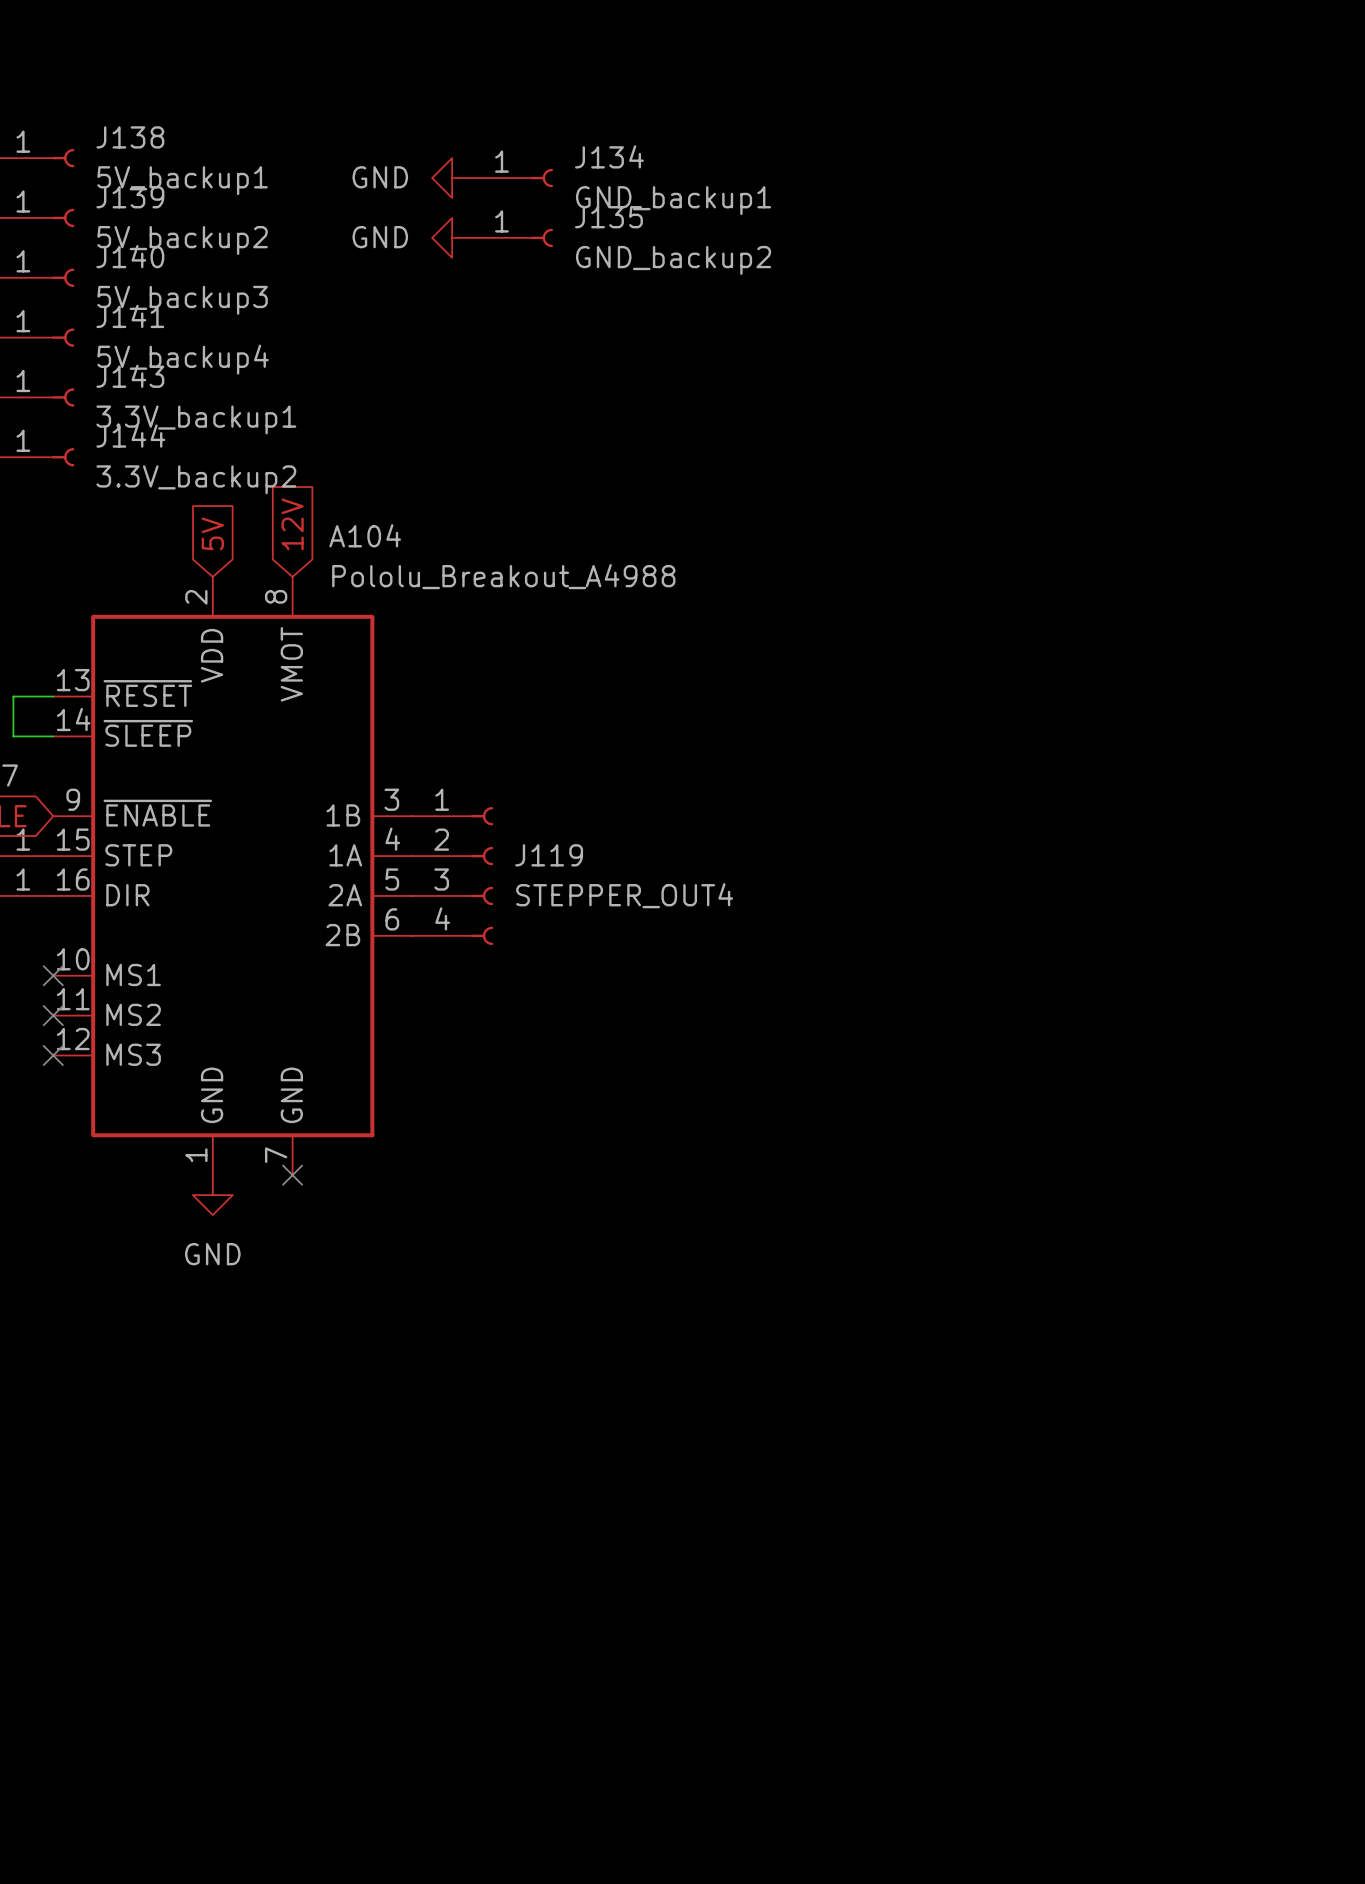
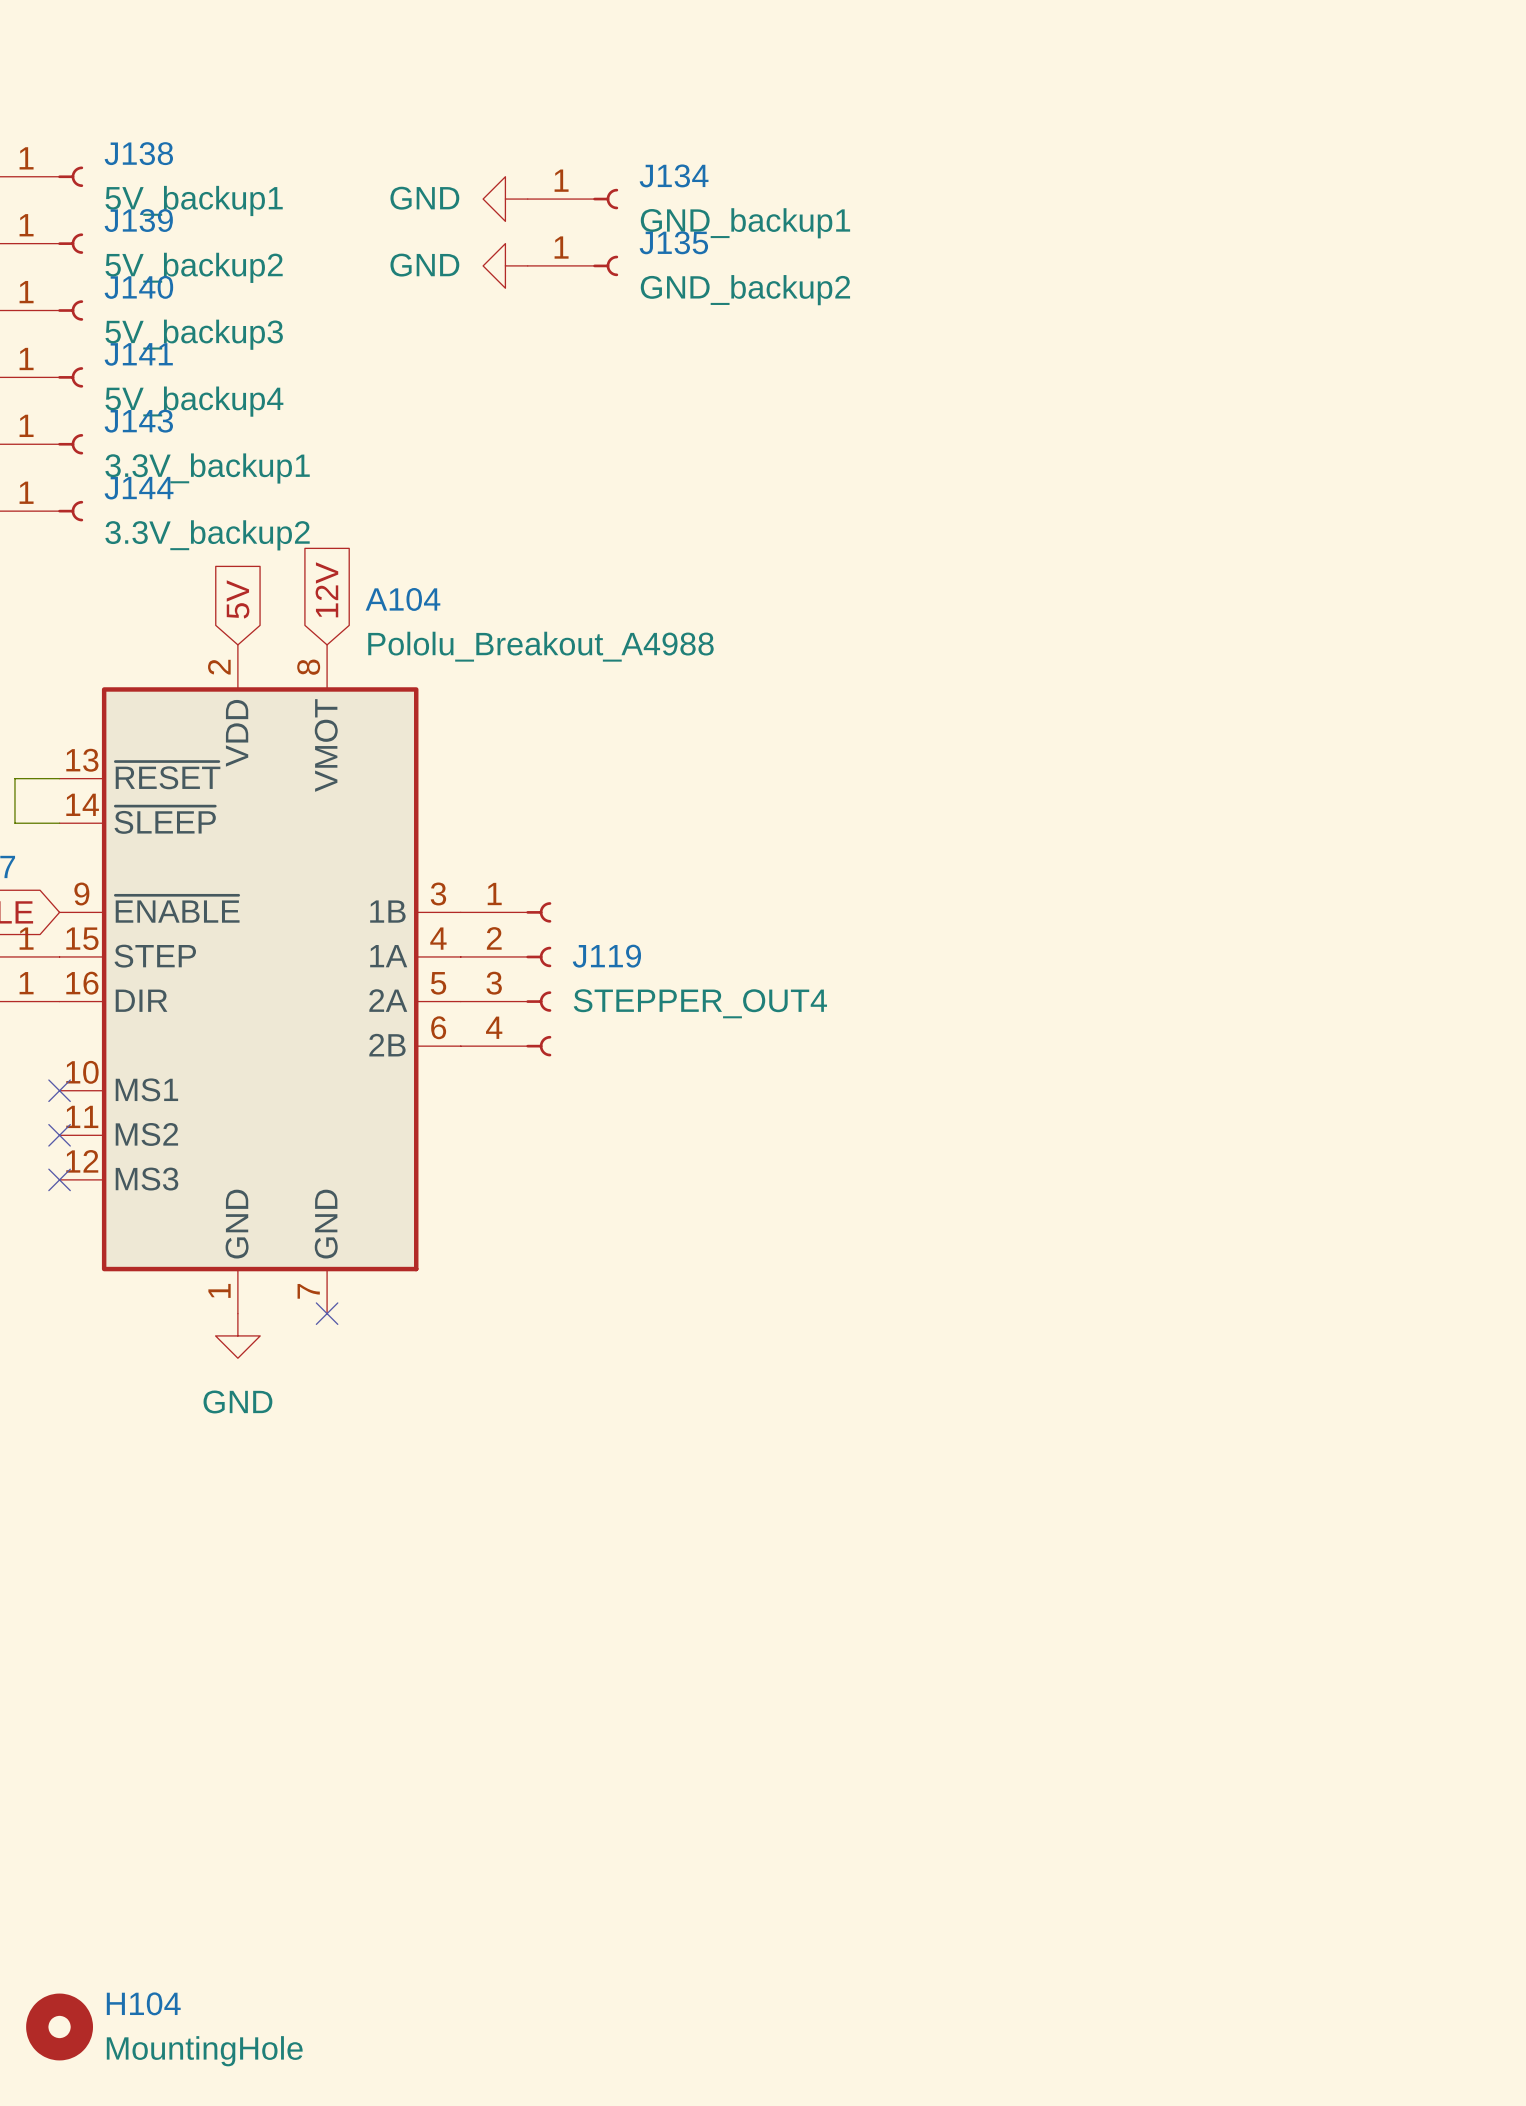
H104: none -> MountingHole (59, 2026)

